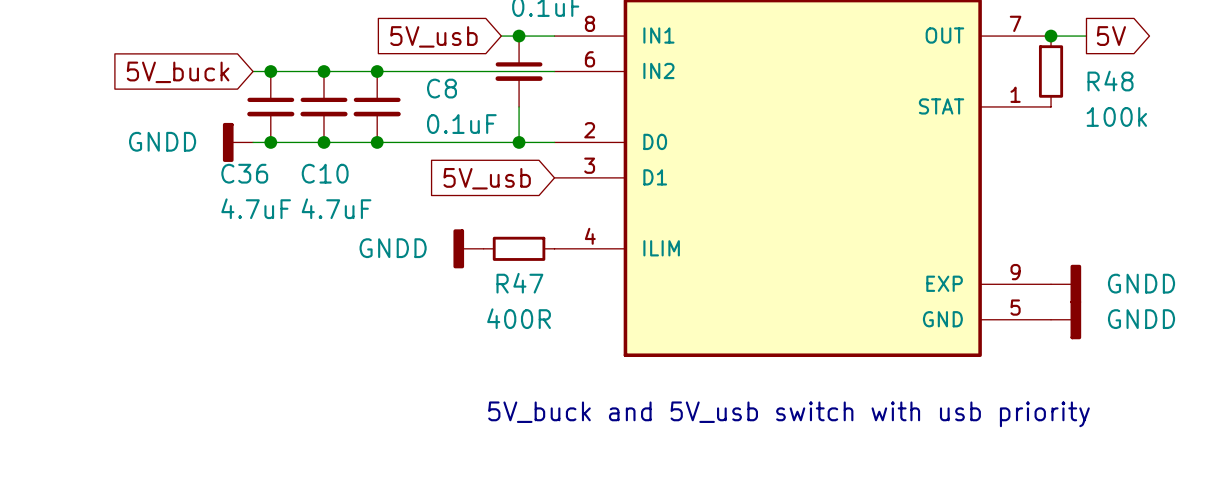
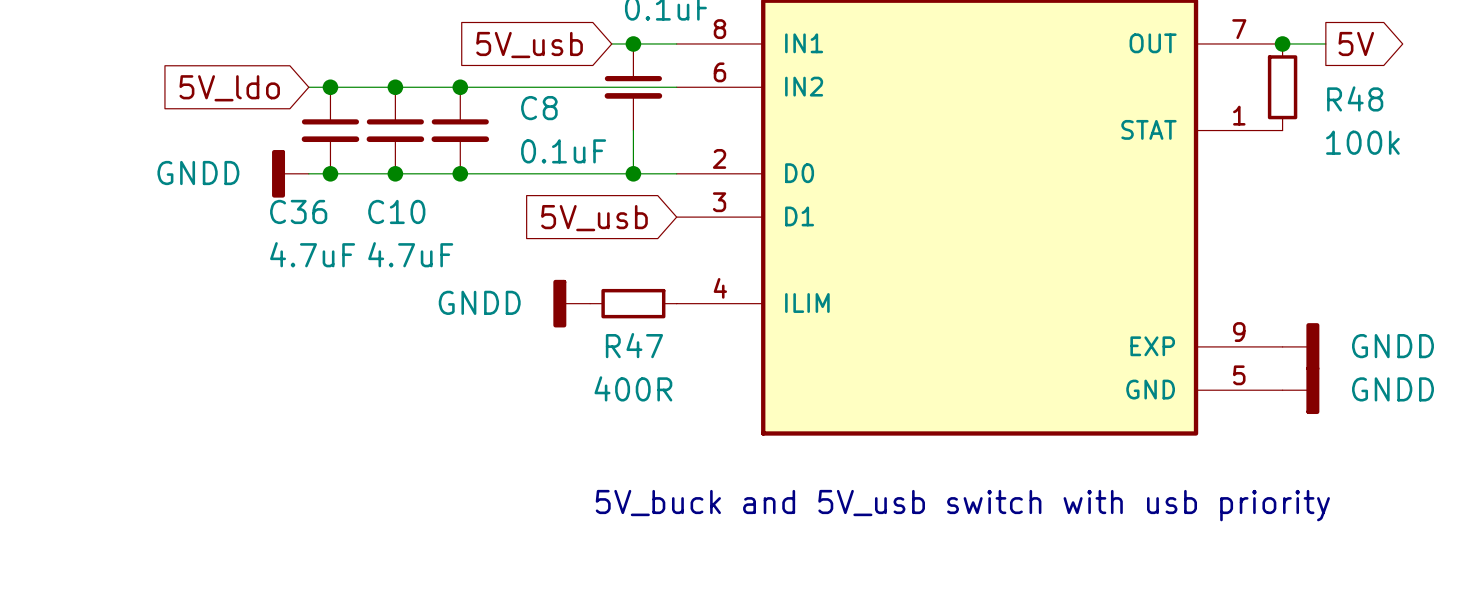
global label: 5V_buck (178, 72) -> 5V_ldo (229, 88)

